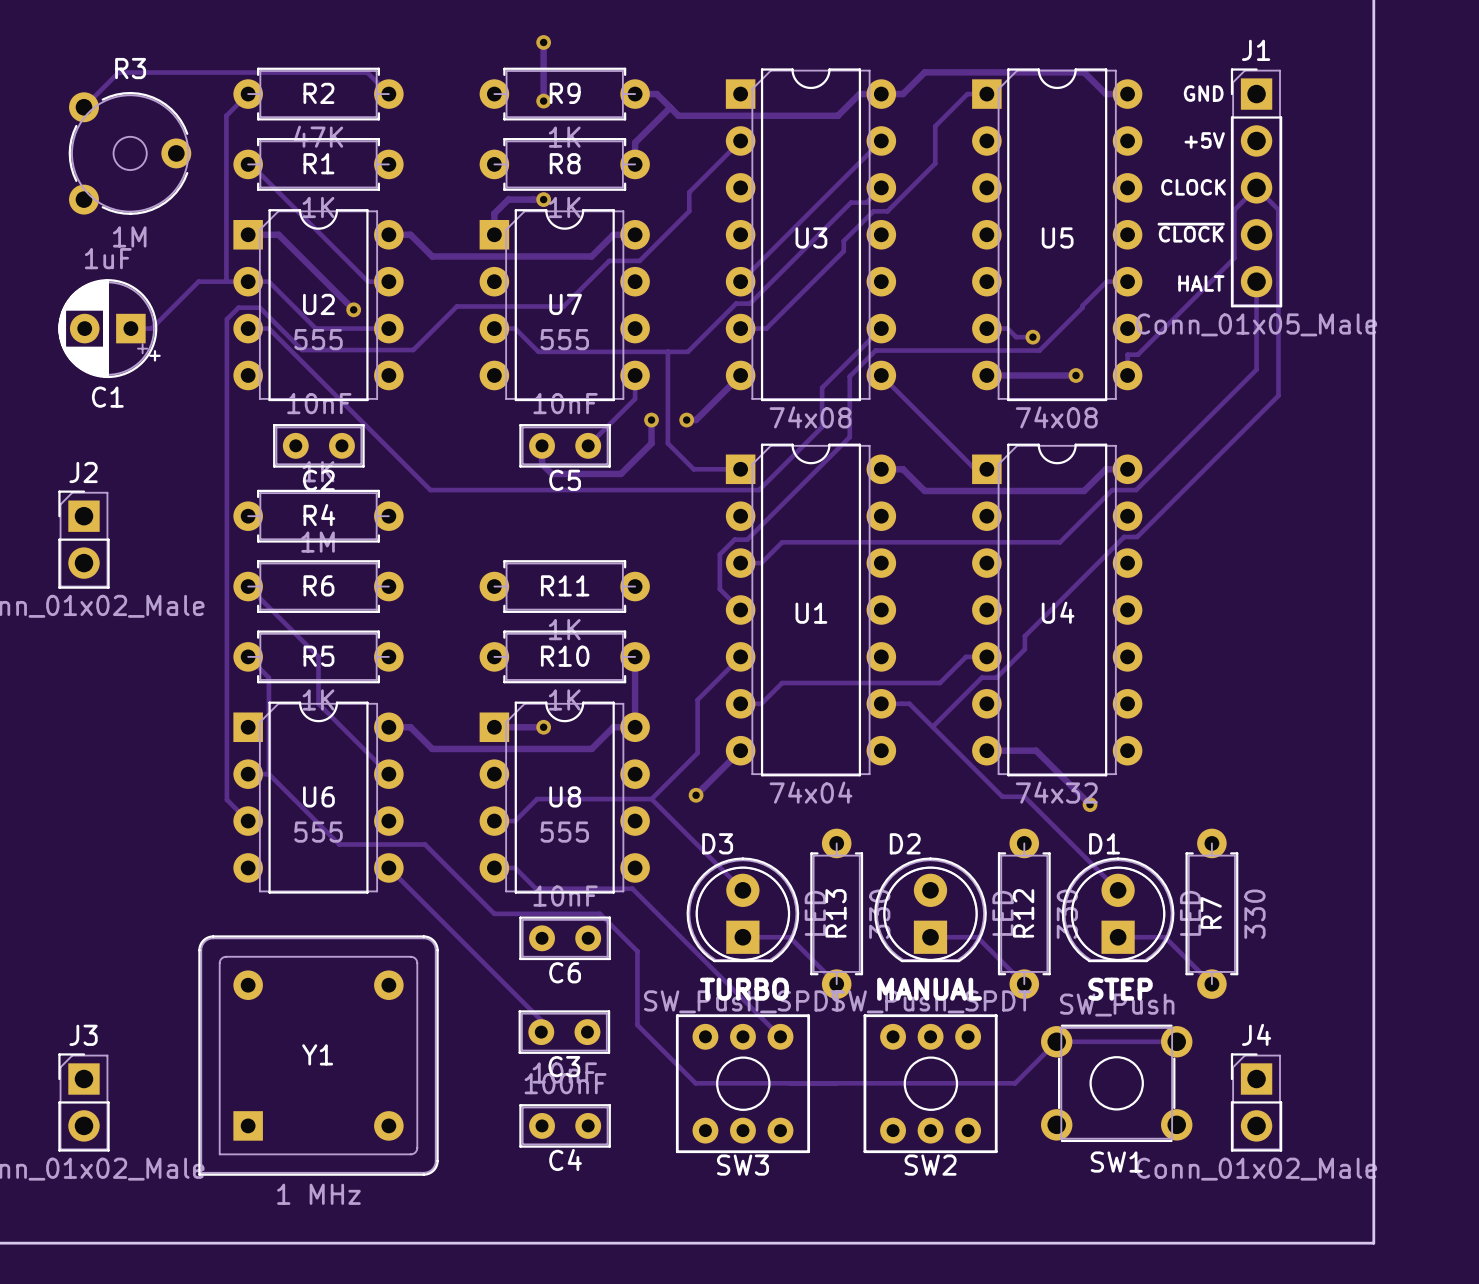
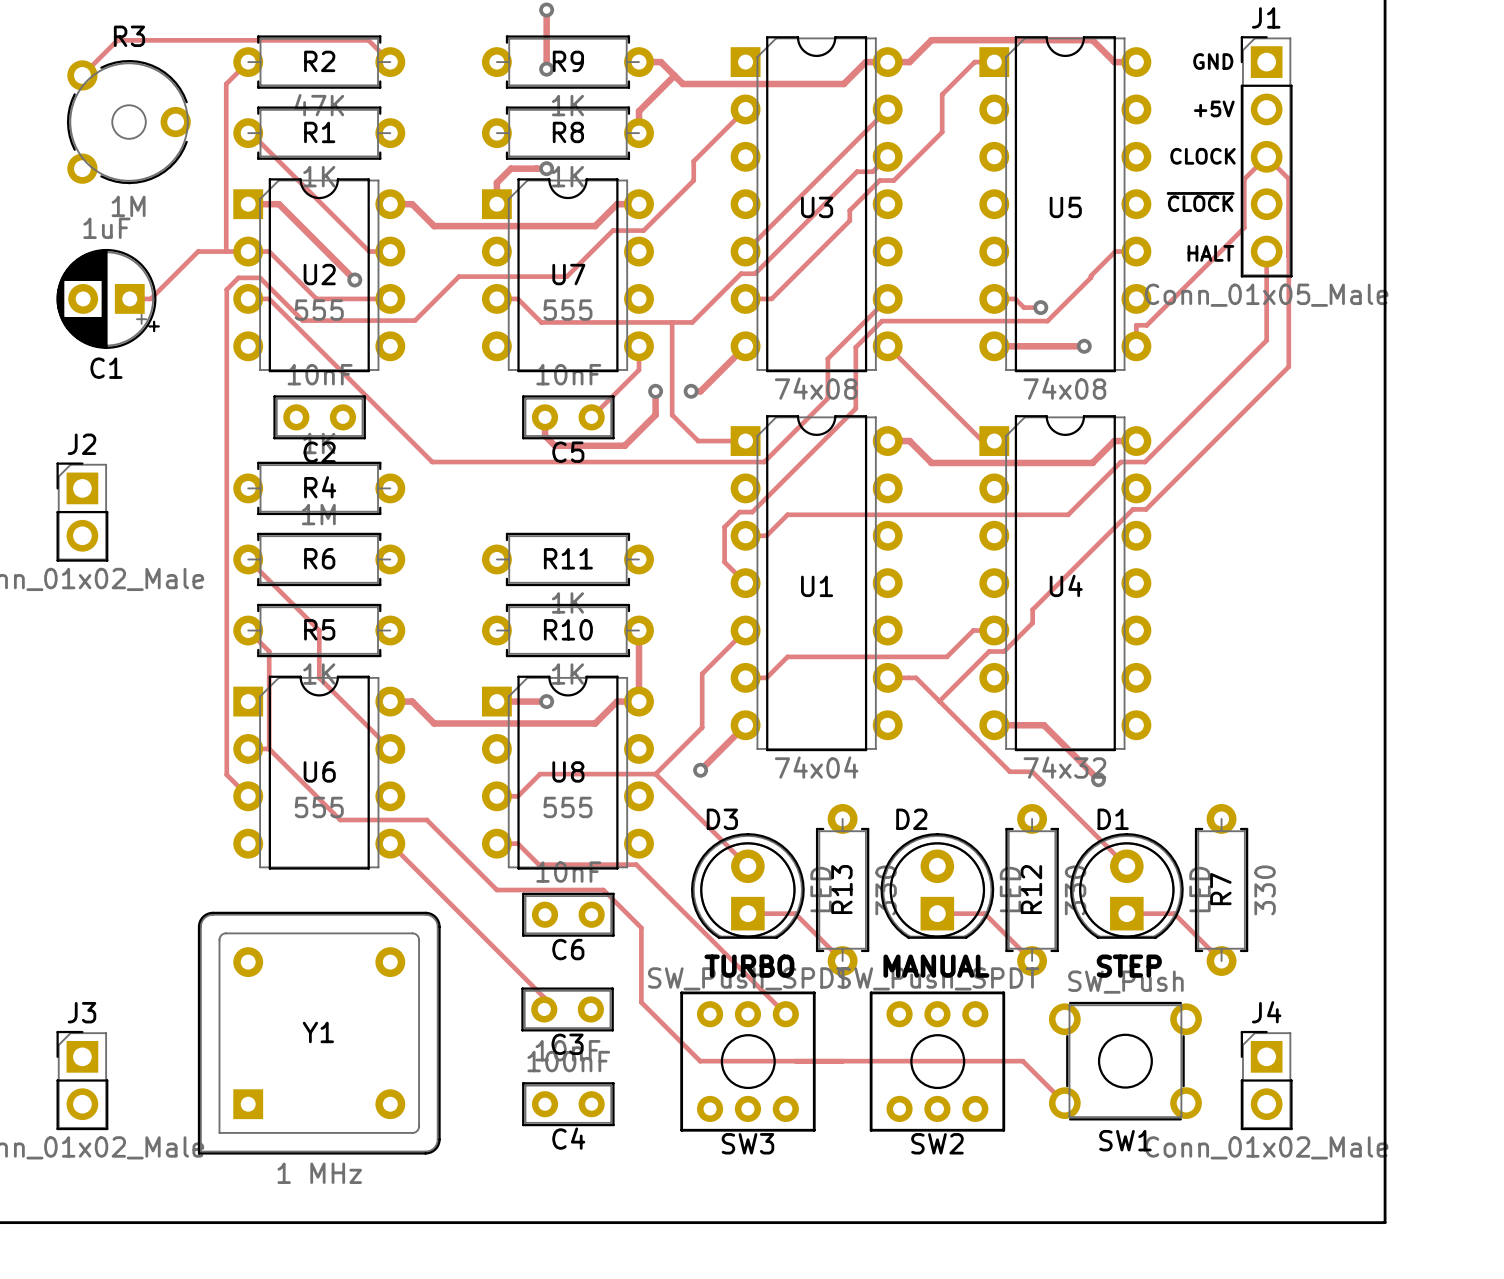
track: (1176, 1041) (1056, 1041) (1015, 1083) -> (1064, 1103) (1022, 1061)

